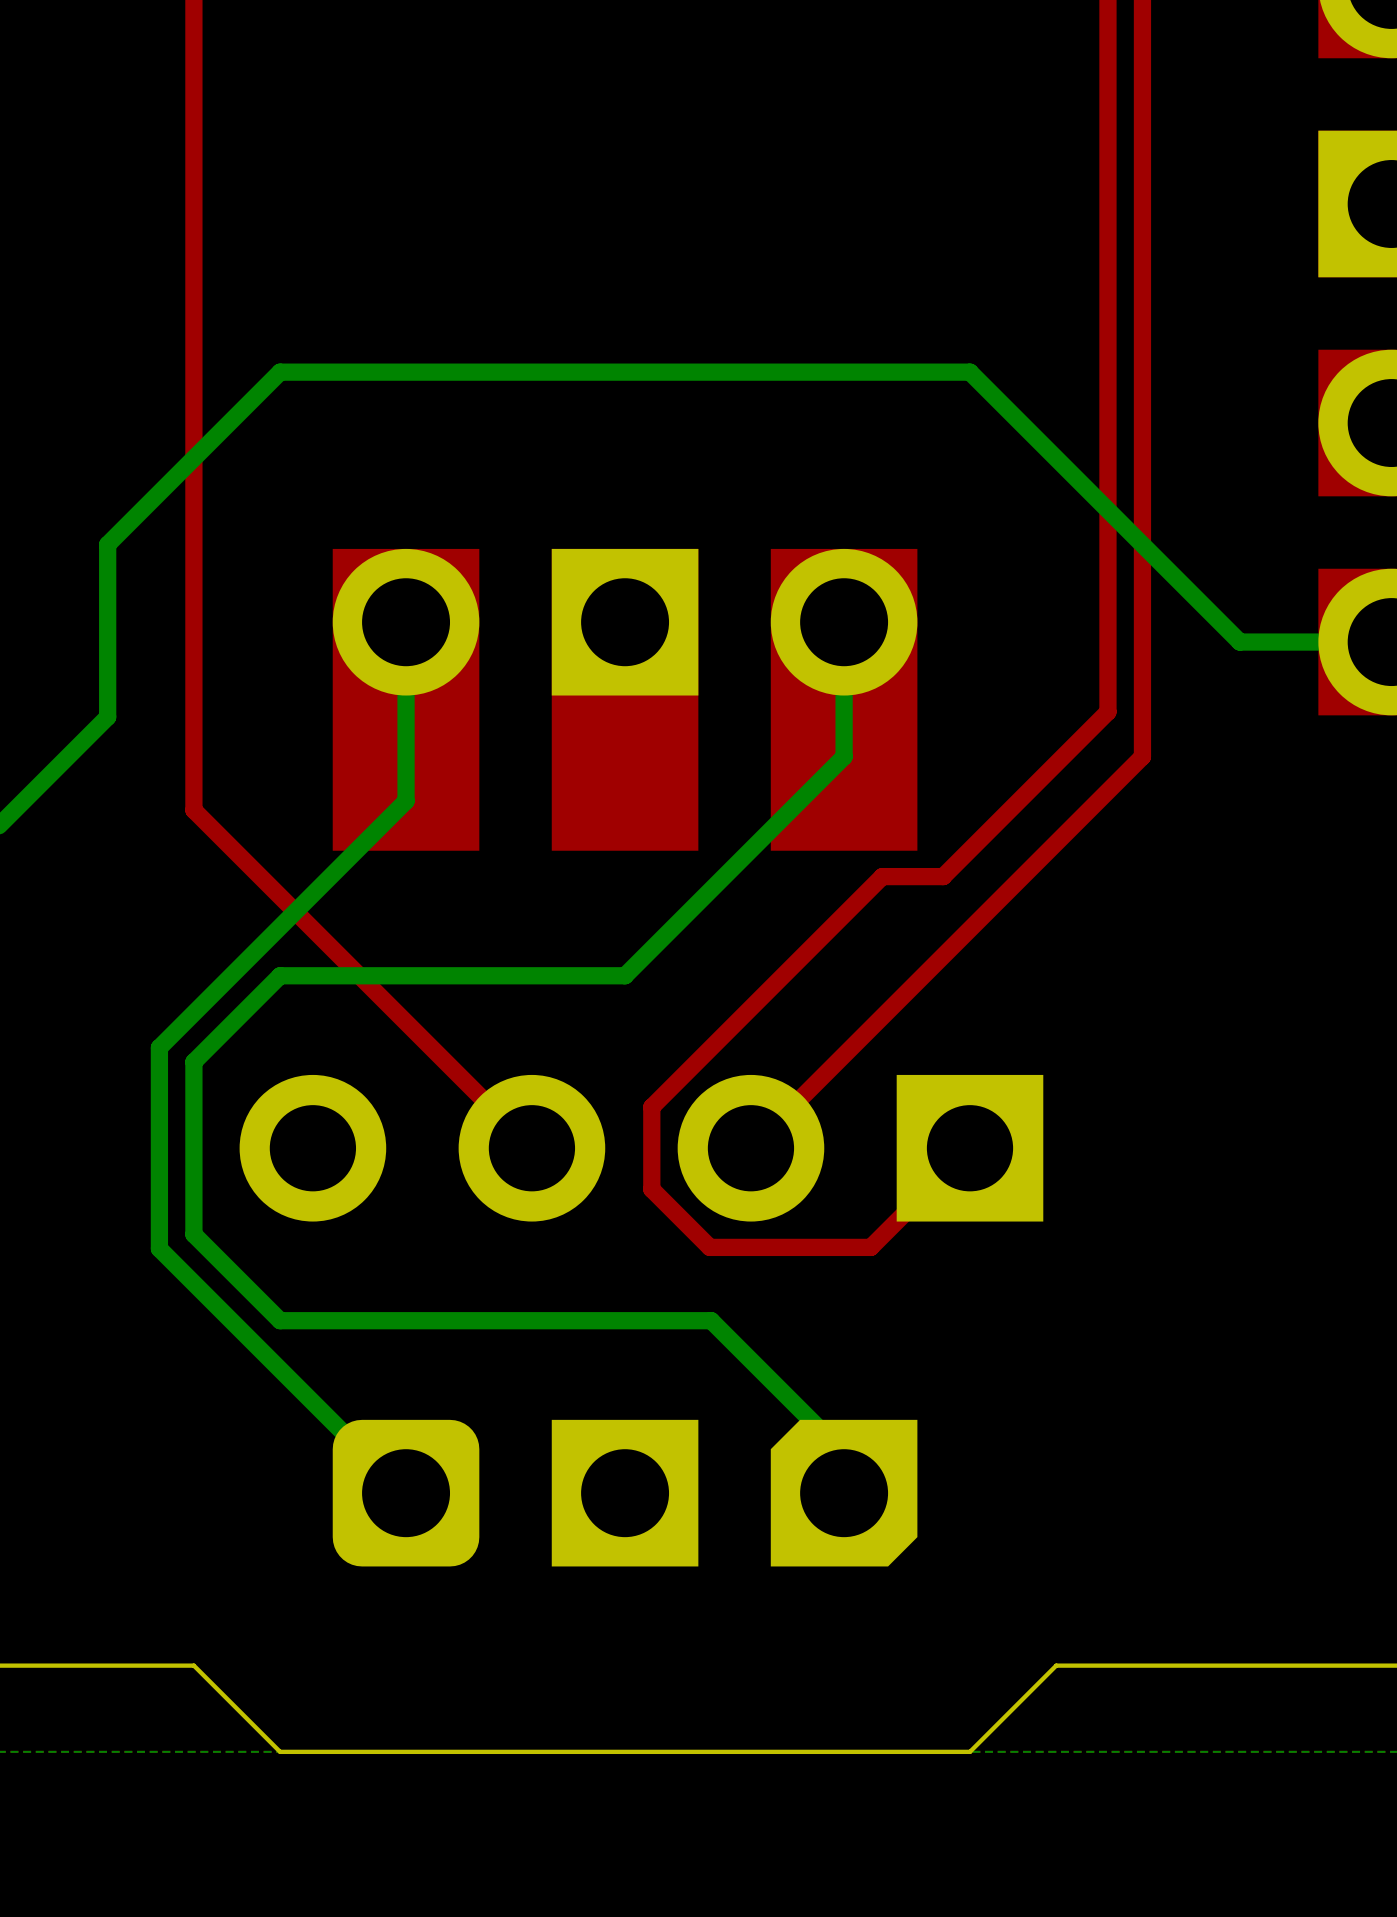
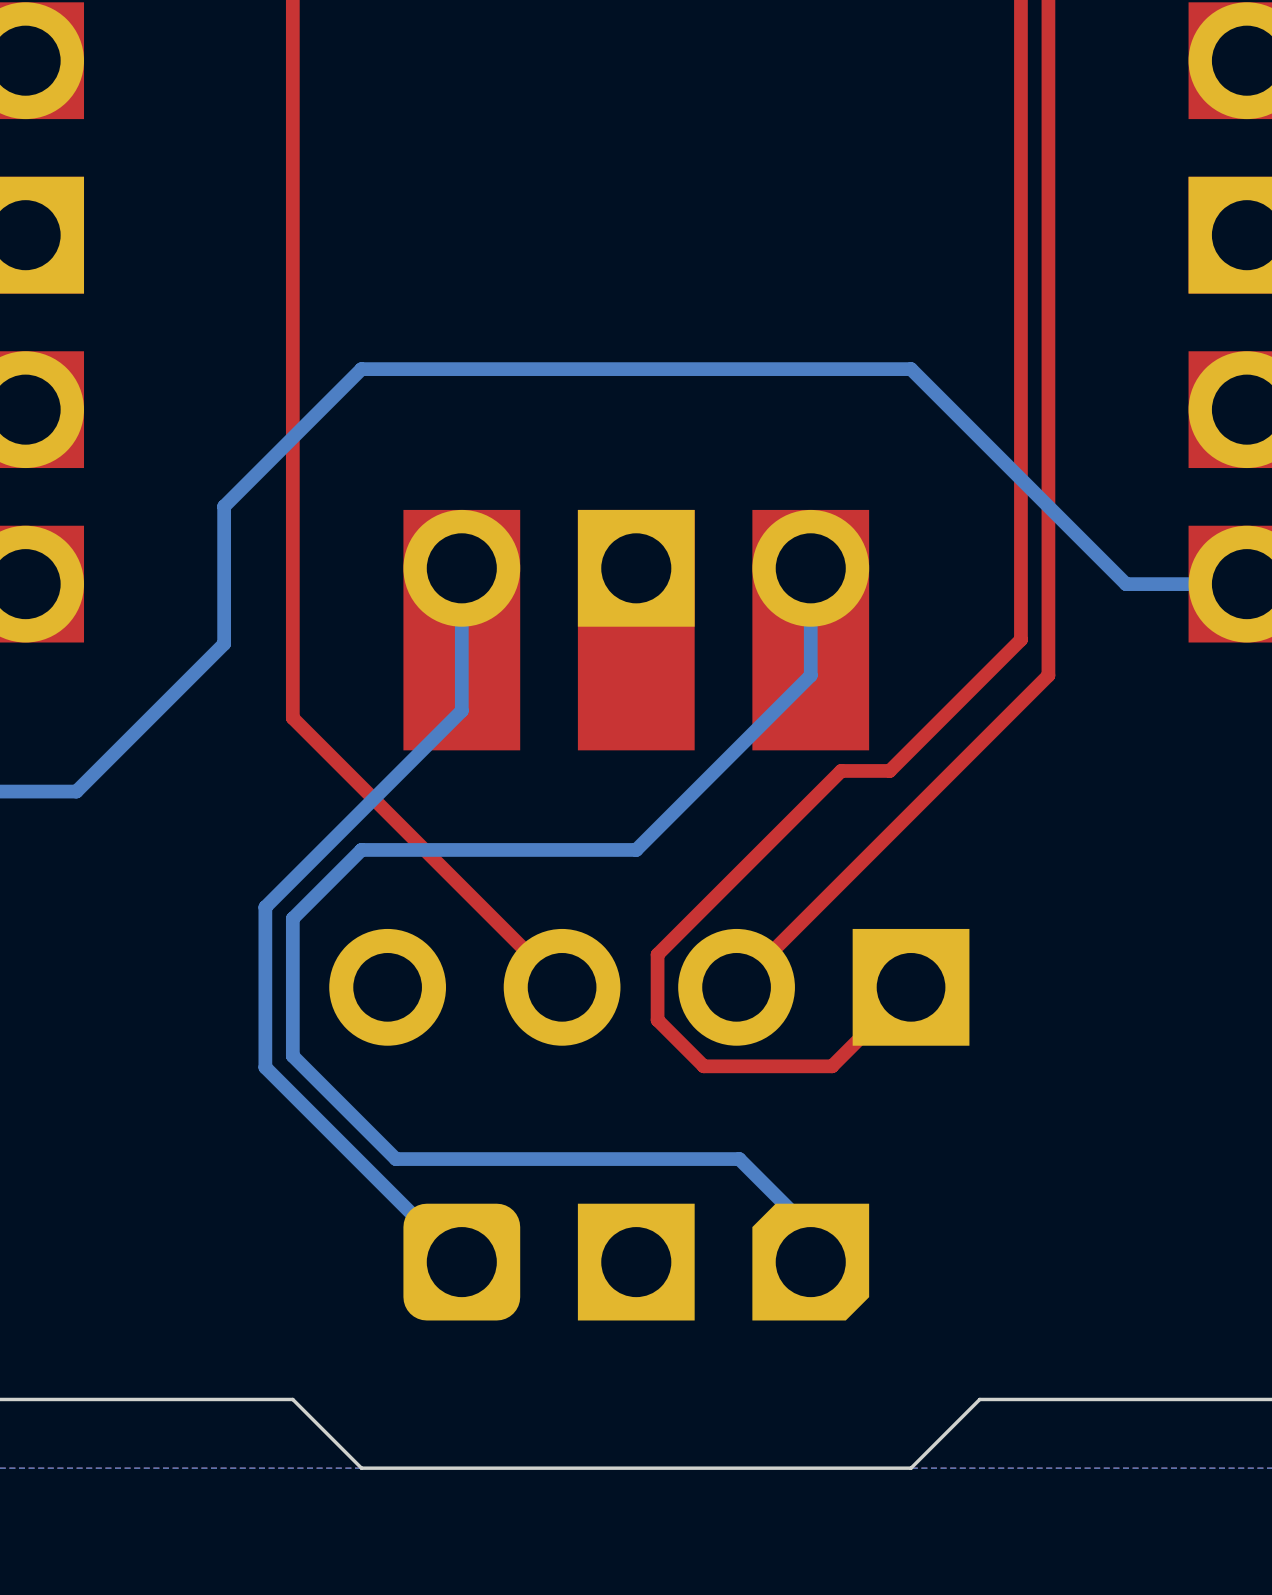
bottom track: (280, 1320) (711, 1320) (754, 1363) -> (361, 1124) (395, 1159) (739, 1159)

